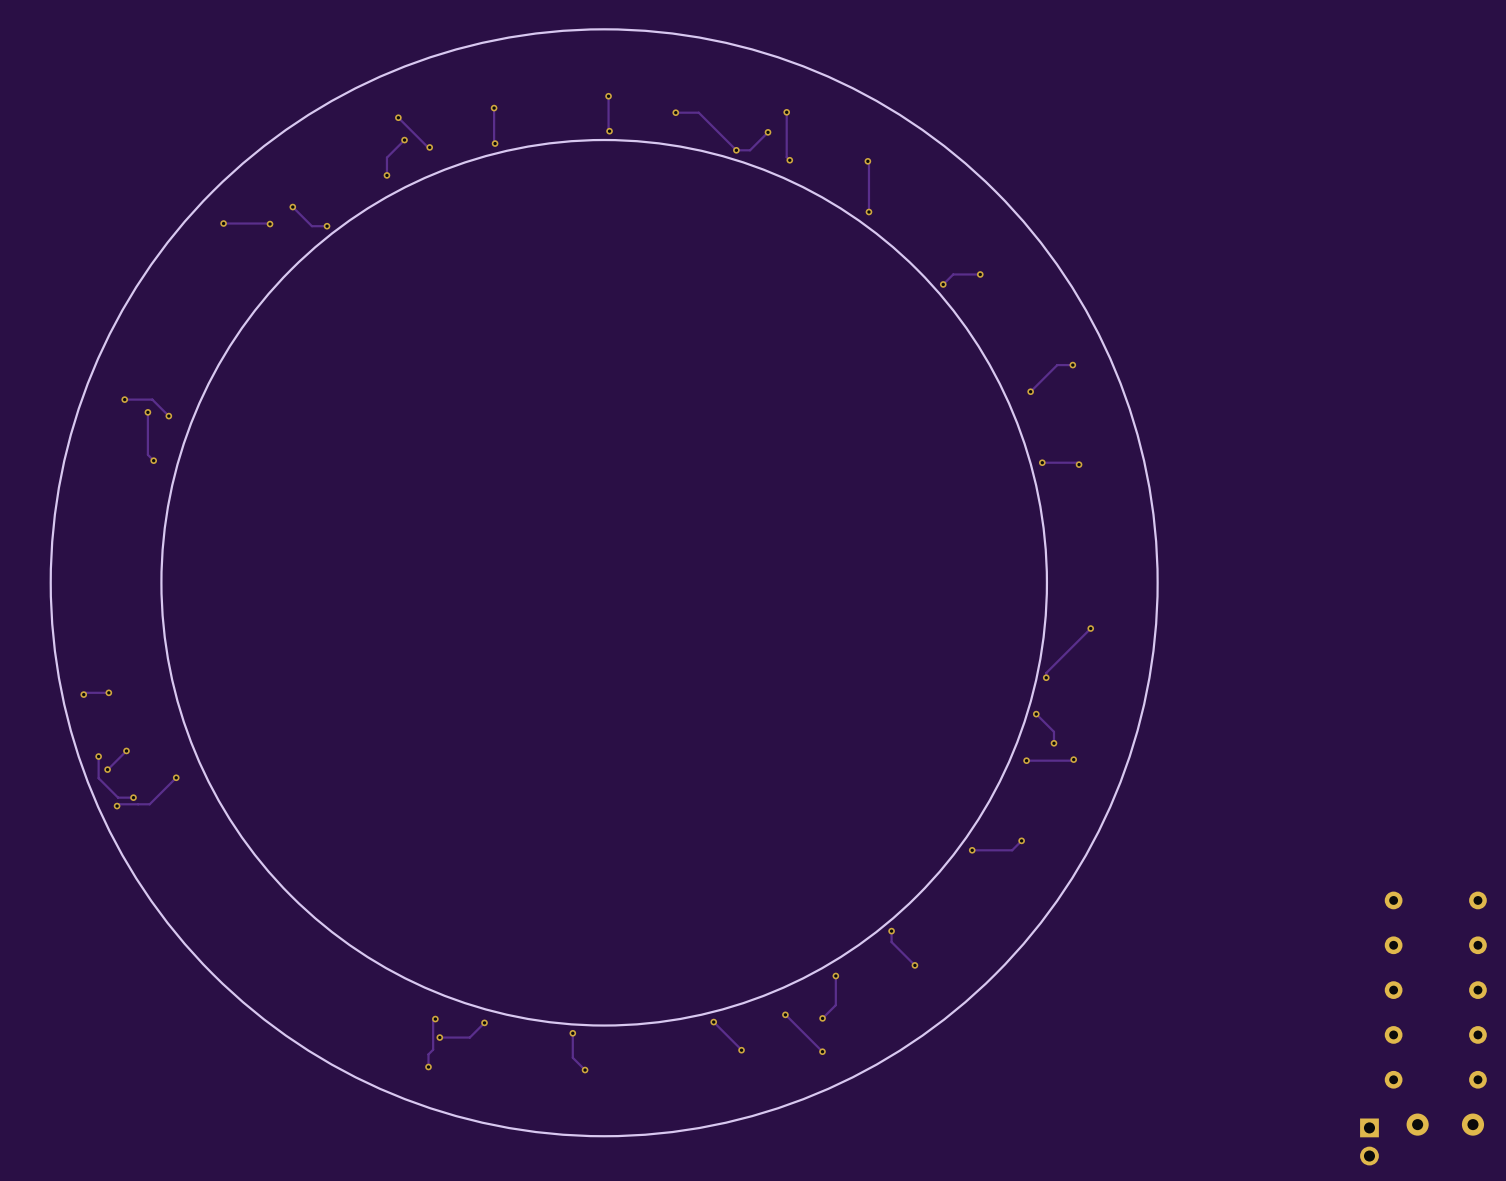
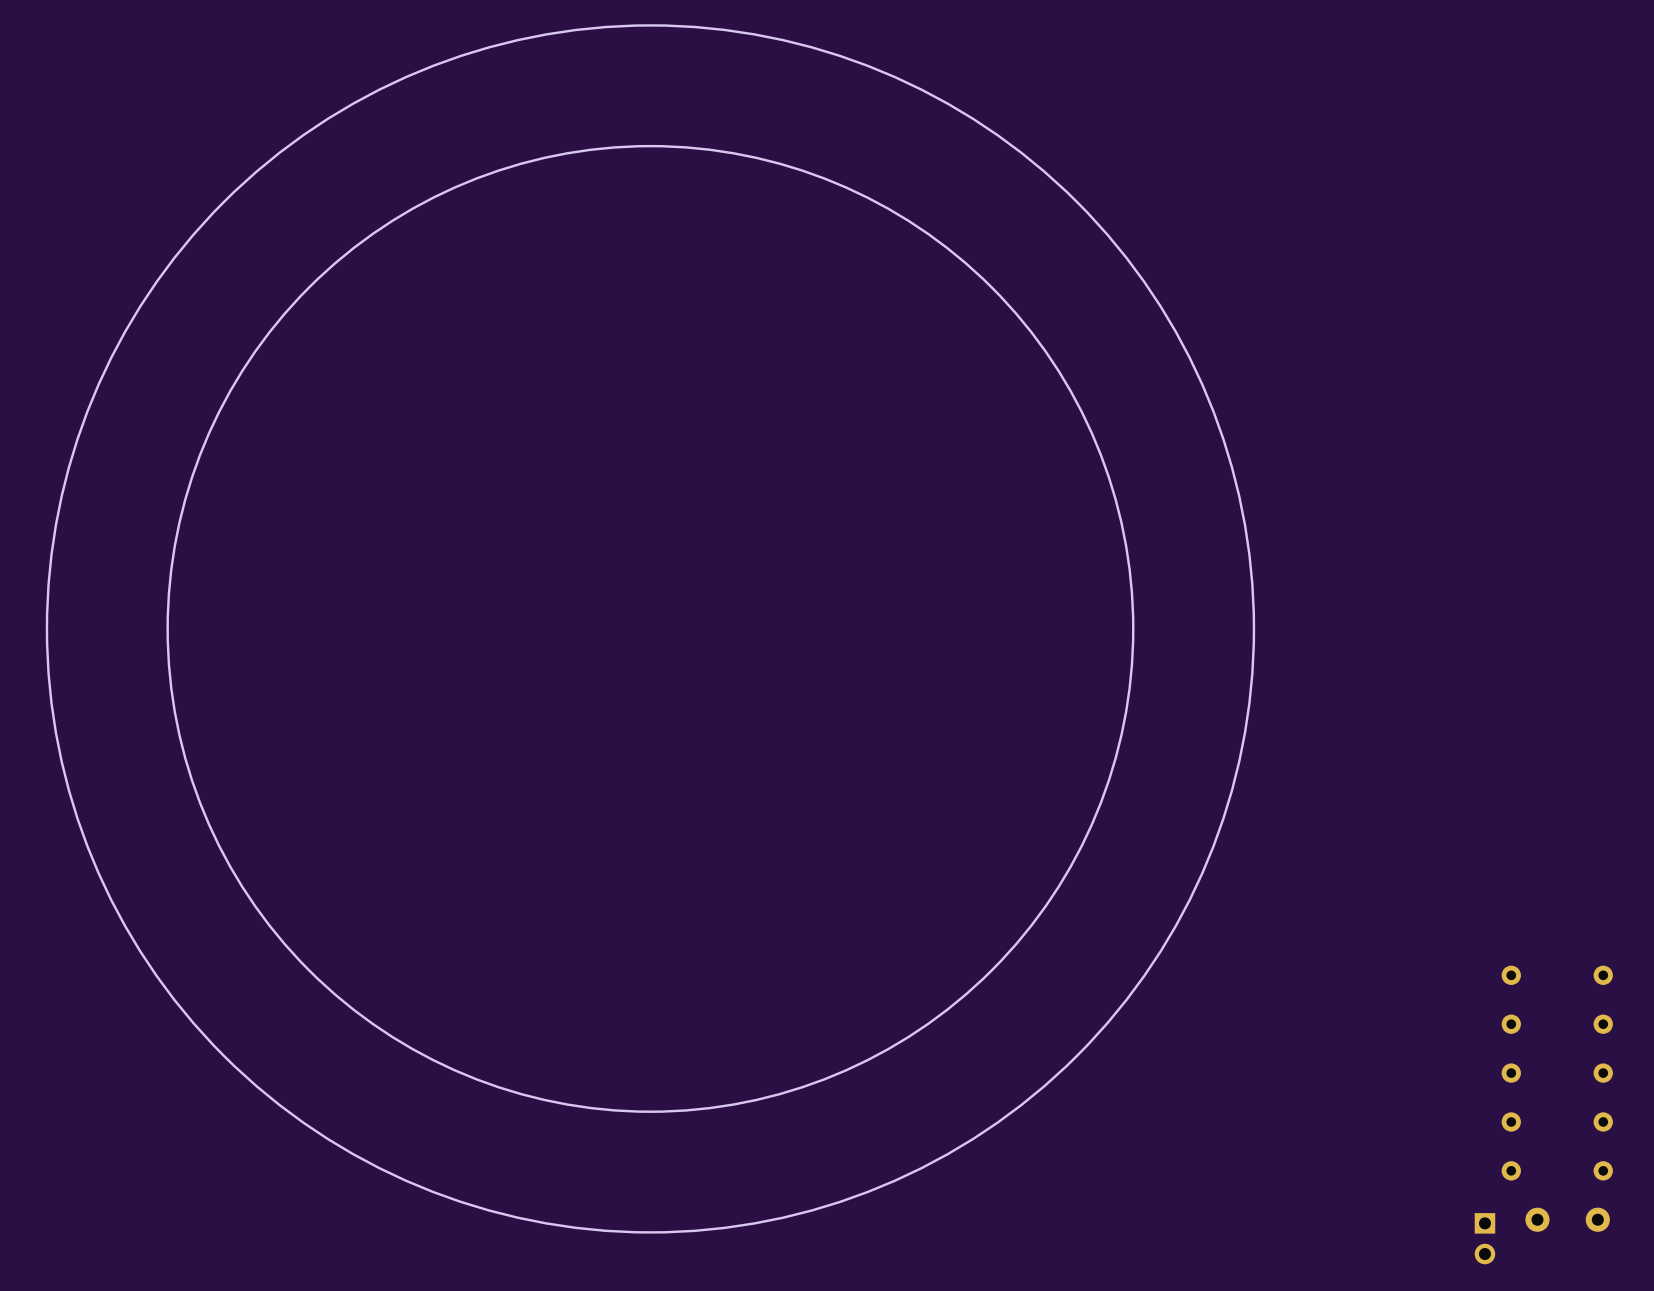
track: (608, 96) (609, 131) -> none
via: (608, 96) -> none
track: (494, 108) (495, 143) -> none
via: (494, 108) -> none
track: (675, 112) (698, 112) (736, 150) (750, 150) (768, 132) -> none
via: (675, 112) -> none
track: (786, 112) (786, 157) (789, 160) -> none
via: (786, 112) -> none
track: (398, 117) (429, 147) -> none
via: (398, 117) -> none
via: (609, 131) -> none
via: (768, 132) -> none
track: (404, 140) (386, 157) (386, 175) -> none
via: (404, 140) -> none
via: (495, 143) -> none
via: (429, 147) -> none
via: (736, 150) -> none
via: (789, 160) -> none
track: (867, 161) (868, 212) -> none
via: (867, 161) -> none
via: (386, 175) -> none
track: (292, 207) (311, 226) (327, 226) -> none
via: (292, 207) -> none
via: (868, 212) -> none
track: (223, 223) (270, 224) -> none
via: (223, 223) -> none
via: (270, 224) -> none
via: (327, 226) -> none
track: (980, 274) (953, 274) (943, 284) -> none
via: (980, 274) -> none
via: (943, 284) -> none
track: (1072, 365) (1057, 365) (1030, 391) -> none
via: (1072, 365) -> none
via: (1030, 391) -> none
track: (124, 399) (152, 399) (168, 416) -> none
via: (124, 399) -> none
track: (147, 412) (147, 454) (153, 460) -> none
via: (147, 412) -> none
via: (168, 416) -> none
via: (153, 460) -> none
track: (1042, 462) (1077, 462) (1079, 464) -> none
via: (1042, 462) -> none
via: (1079, 464) -> none
track: (1090, 628) (1046, 673) (1046, 677) -> none
via: (1090, 628) -> none
via: (1046, 677) -> none
track: (108, 692) (85, 692) (83, 694) -> none
via: (108, 692) -> none
via: (83, 694) -> none
track: (1036, 714) (1053, 731) (1053, 743) -> none
via: (1036, 714) -> none
via: (1053, 743) -> none
track: (126, 750) (107, 769) -> none
via: (126, 750) -> none
track: (98, 756) (98, 778) (118, 797) (133, 797) -> none
via: (98, 756) -> none
track: (1073, 759) (1026, 760) -> none
via: (1073, 759) -> none
via: (1026, 760) -> none
via: (107, 769) -> none
track: (177, 776) (149, 804) (118, 804) (117, 806) -> none
via: (176, 777) -> none
via: (133, 797) -> none
via: (117, 806) -> none
track: (1021, 840) (1012, 850) (972, 850) -> none
via: (1021, 840) -> none
via: (972, 850) -> none
track: (891, 931) (891, 942) (914, 965) -> none
via: (891, 931) -> none
via: (914, 965) -> none
track: (835, 976) (835, 1005) (822, 1018) -> none
via: (835, 976) -> none
track: (785, 1014) (822, 1051) -> none
via: (785, 1014) -> none
via: (822, 1018) -> none
track: (435, 1019) (433, 1021) (433, 1049) (428, 1054) (428, 1067) -> none
via: (435, 1019) -> none
track: (484, 1022) (469, 1037) (439, 1037) -> none
via: (484, 1022) -> none
track: (713, 1022) (741, 1050) -> none
via: (713, 1022) -> none
track: (572, 1033) (572, 1057) (585, 1070) -> none
via: (572, 1033) -> none
via: (439, 1037) -> none
via: (741, 1050) -> none
via: (822, 1051) -> none
via: (428, 1067) -> none
via: (585, 1070) -> none

